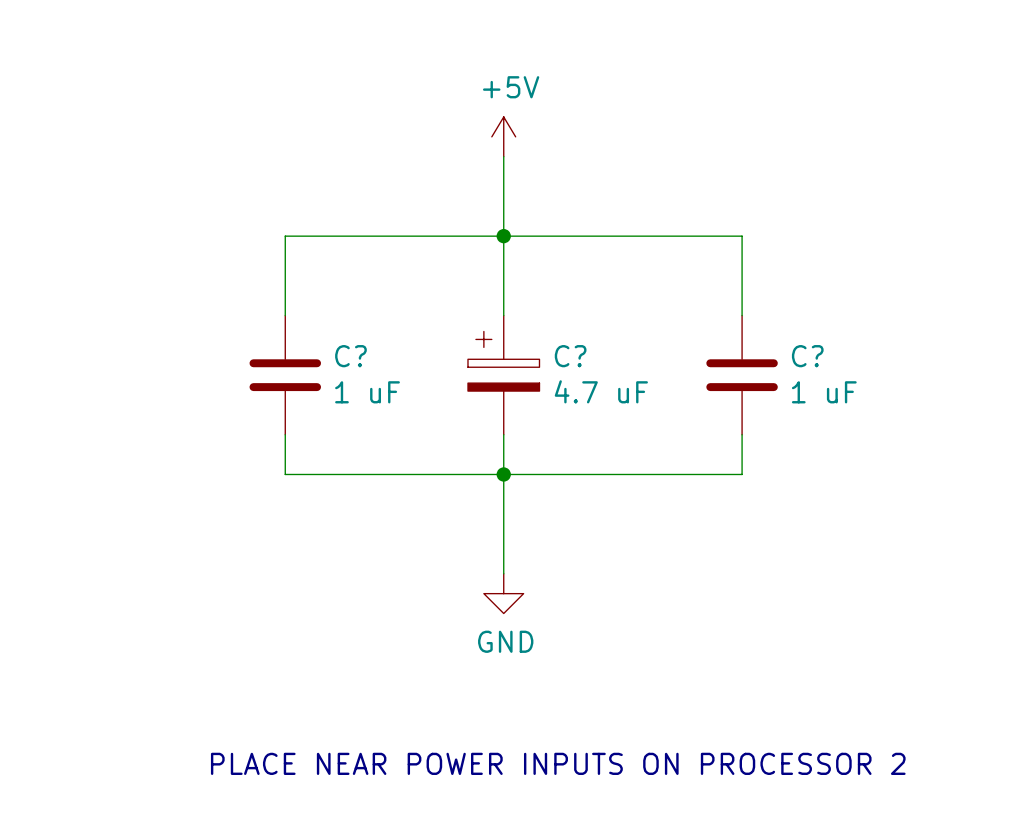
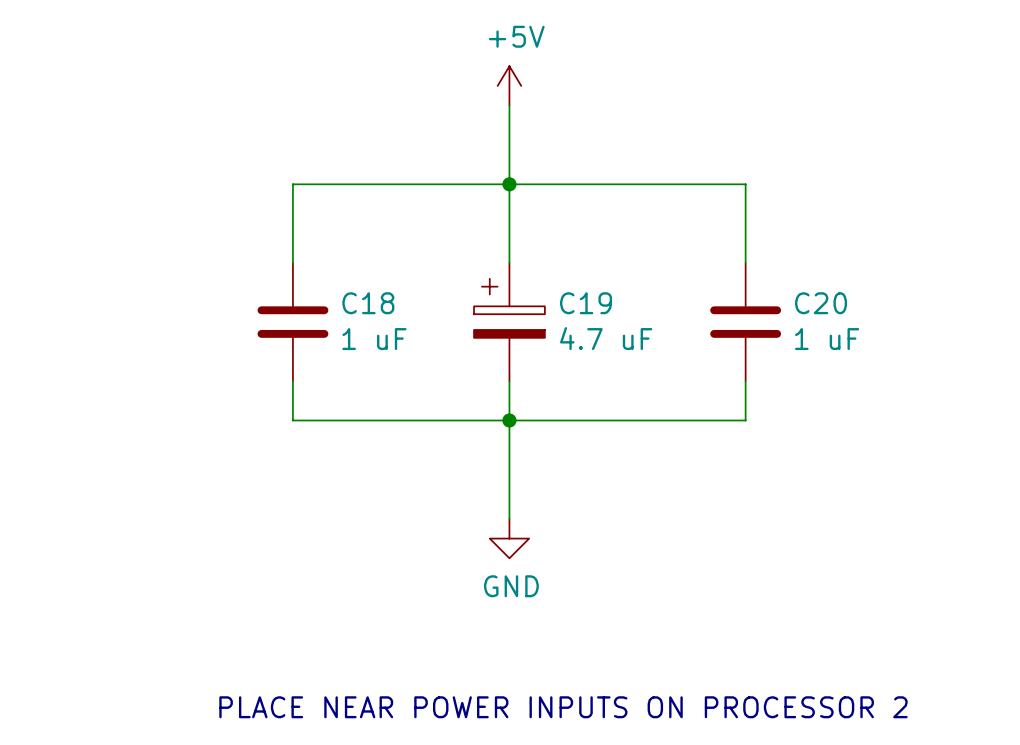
C? name: C? (350, 356) -> C18 (368, 303)
C? name: C? (570, 356) -> C19 (586, 303)
C? name: C? (807, 356) -> C20 (821, 303)

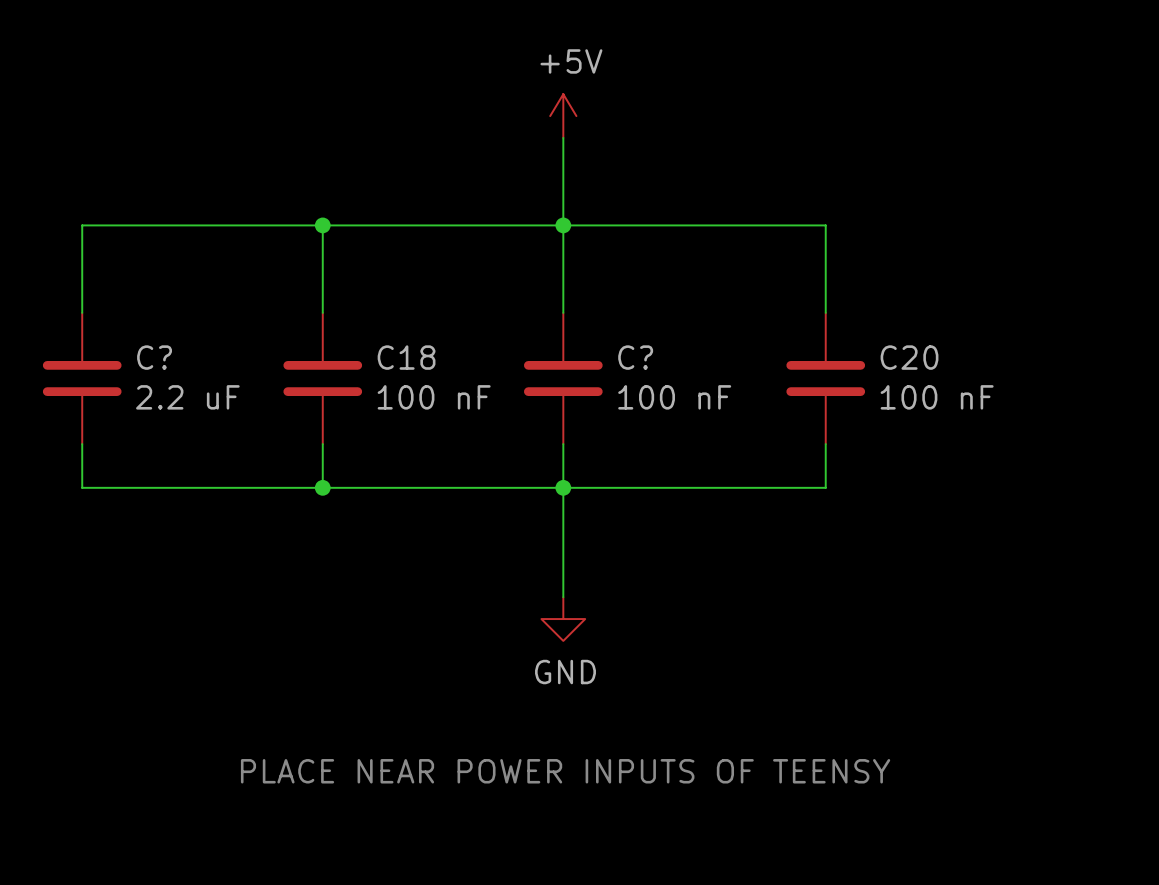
wire: none -> (322, 225) (82, 225) (82, 312)
junction: none -> (322, 225)
C?: none -> 2.2 uF (82, 378)
C19: 4.7 uF (509, 322) -> none
C?: none -> 100 nF (563, 378)
C18 value: 1 uF (374, 339) -> 100 nF (434, 397)
C20 value: 1 uF (827, 339) -> 100 nF (937, 397)
wire: none -> (82, 444) (82, 487) (322, 487)
junction: none -> (322, 487)
text: PLACE NEAR POWER INPUTS ON PROCESSOR 2 (563, 707) -> PLACE NEAR POWER INPUTS OF TEENSY (565, 771)

